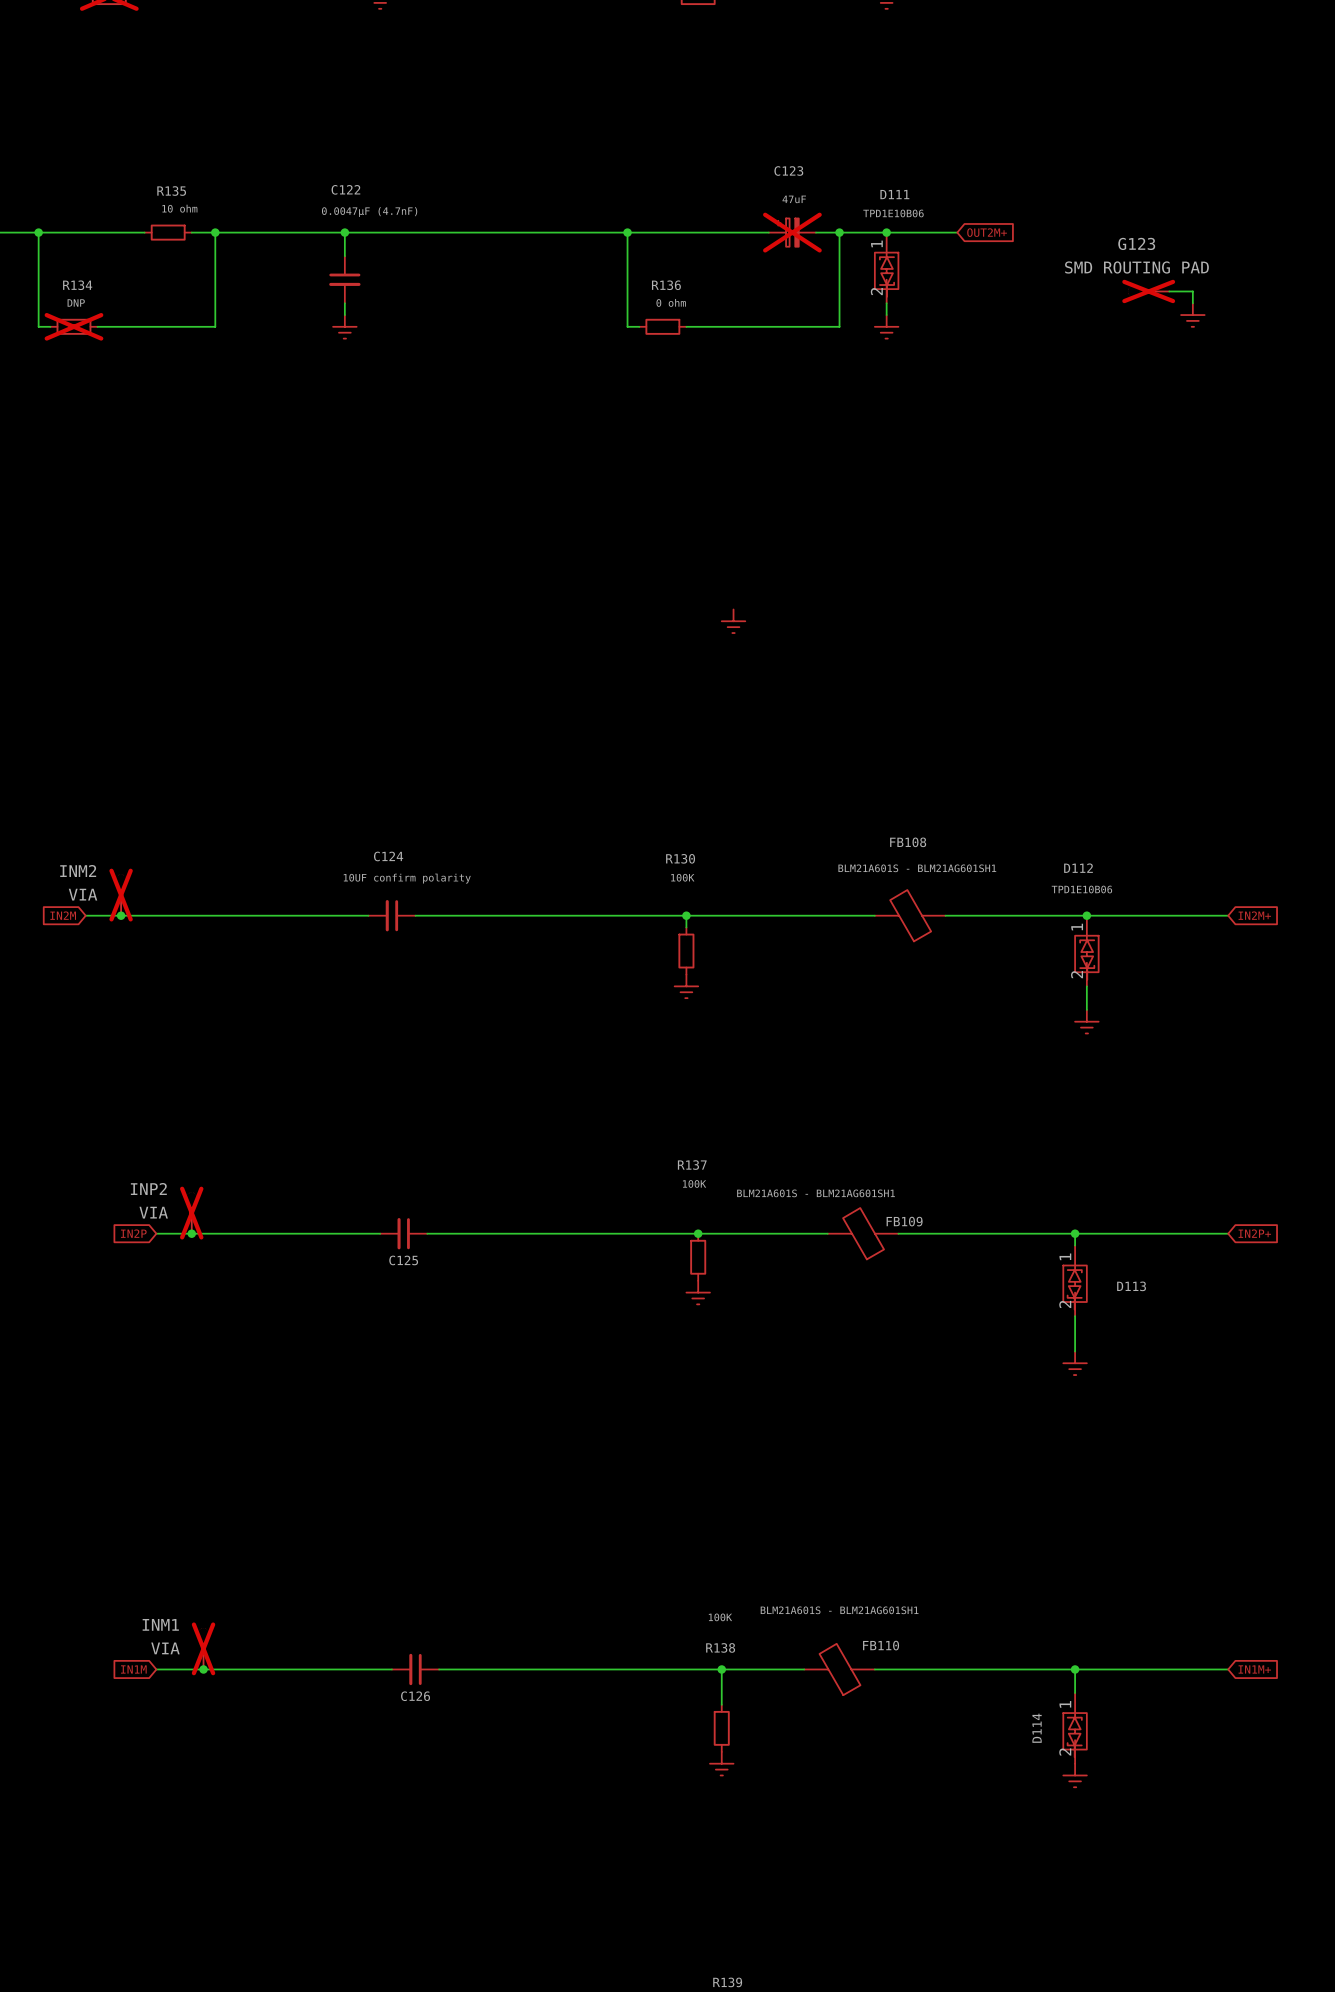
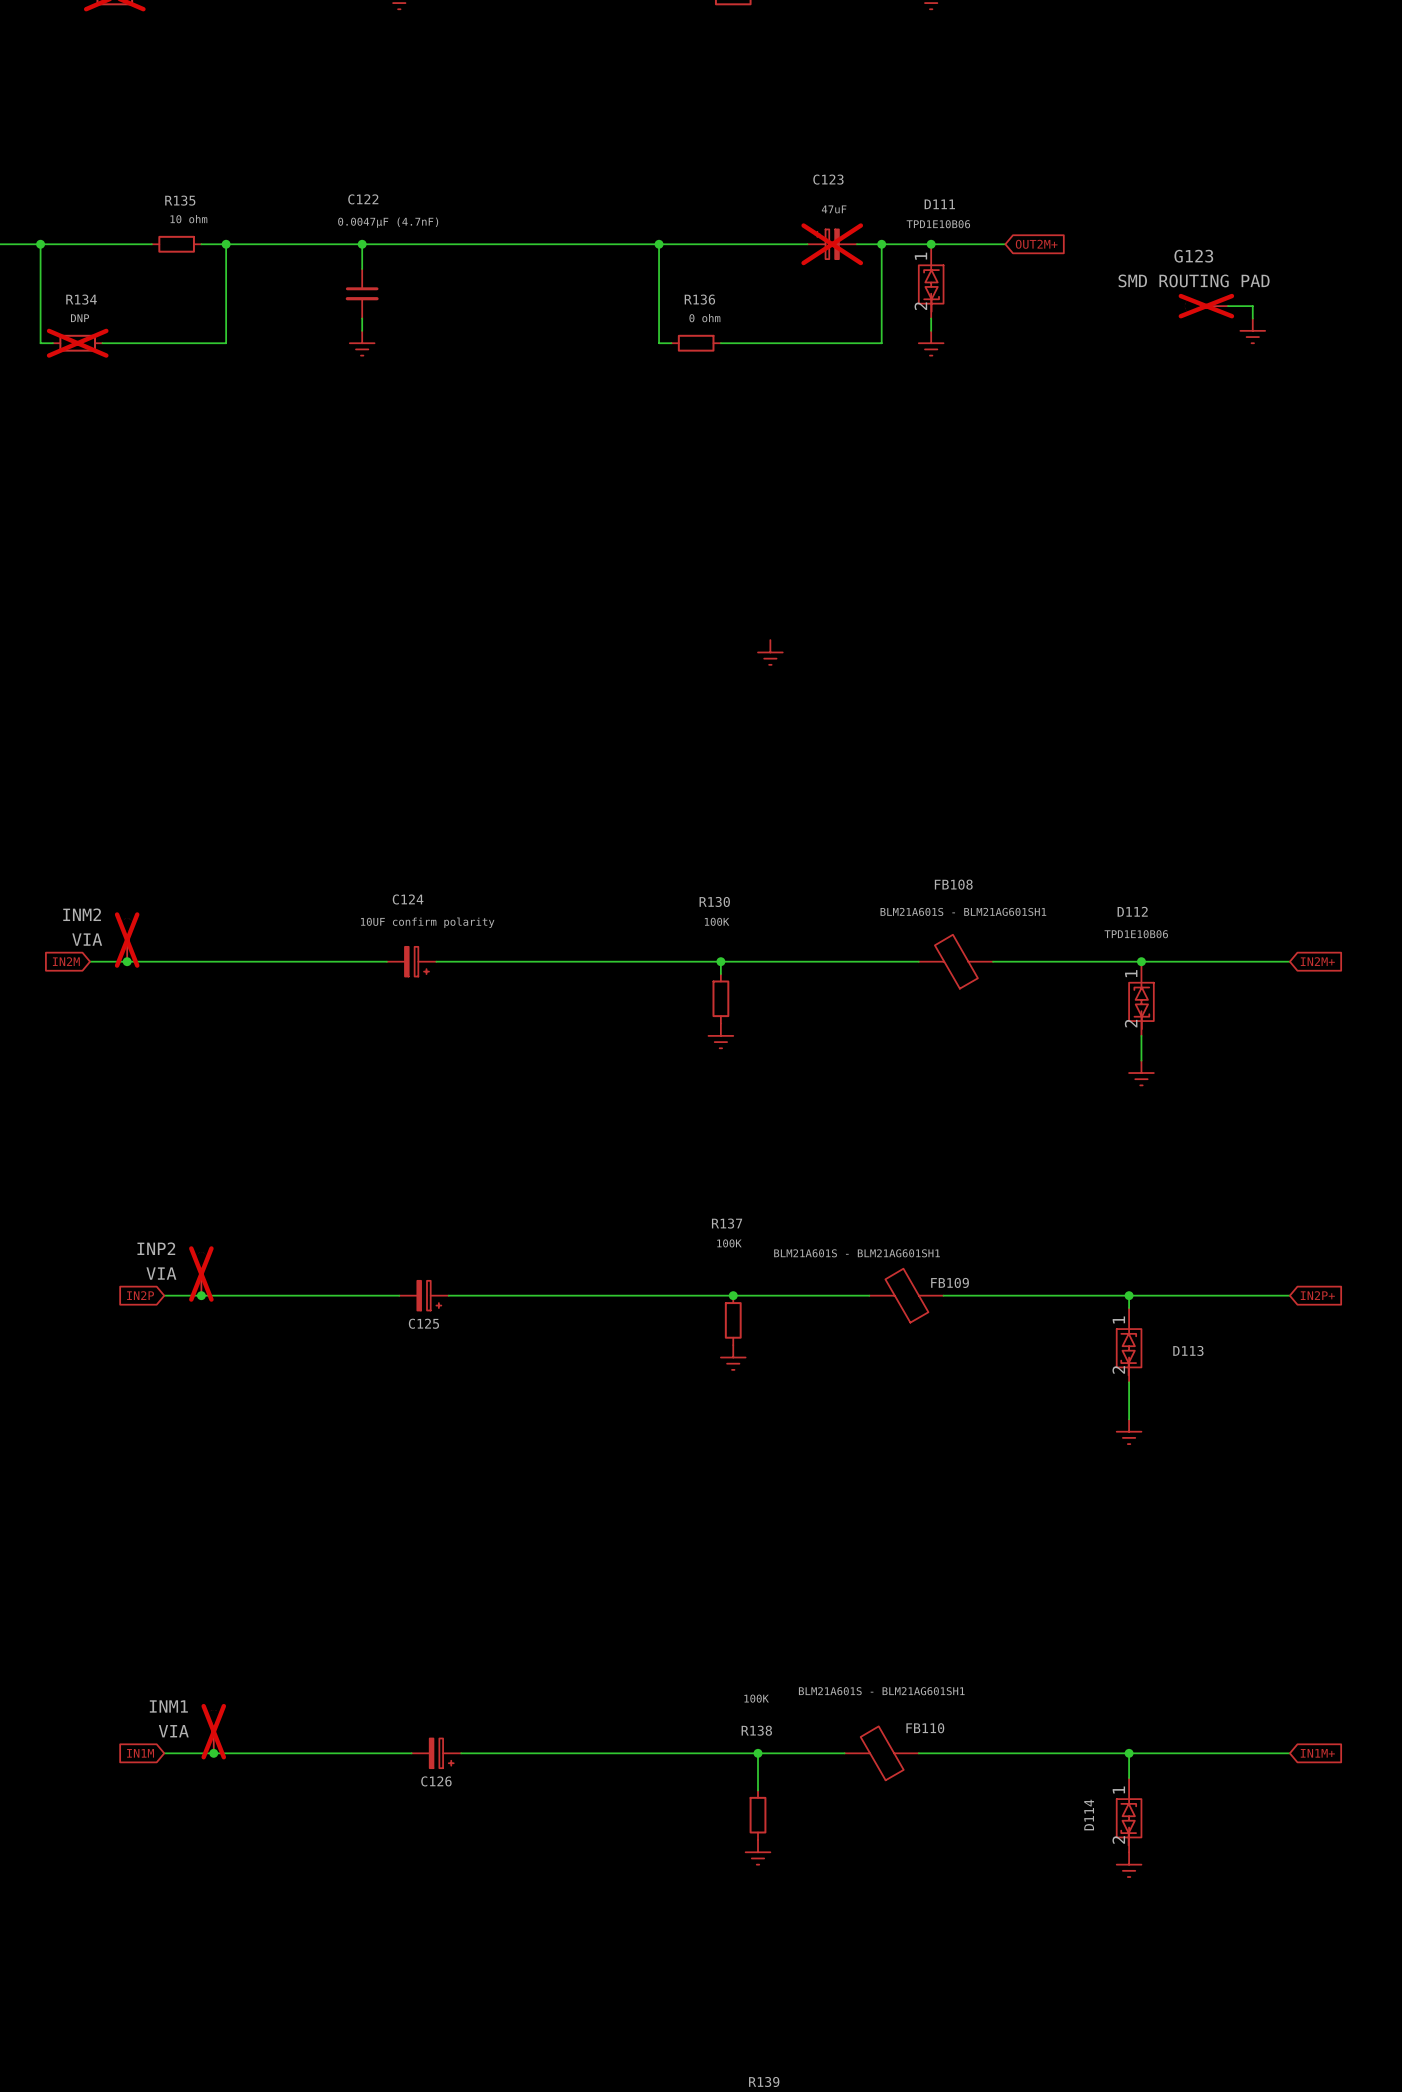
C124 symbol: [368, 900, 416, 932] -> [386, 946, 437, 977]
C125 symbol: [380, 1218, 428, 1250] -> [399, 1280, 449, 1311]
C126 symbol: [391, 1653, 440, 1686] -> [411, 1738, 462, 1769]

